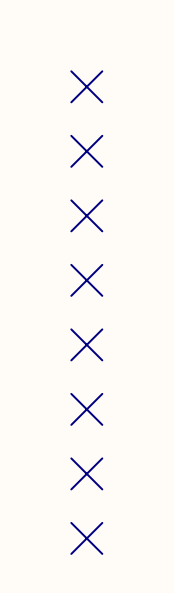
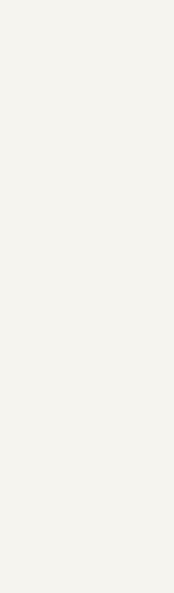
no-connect mark: (86, 86) -> none
no-connect mark: (86, 151) -> none
no-connect mark: (86, 215) -> none
no-connect mark: (86, 280) -> none
no-connect mark: (86, 344) -> none
no-connect mark: (86, 409) -> none
no-connect mark: (86, 473) -> none
no-connect mark: (86, 538) -> none

